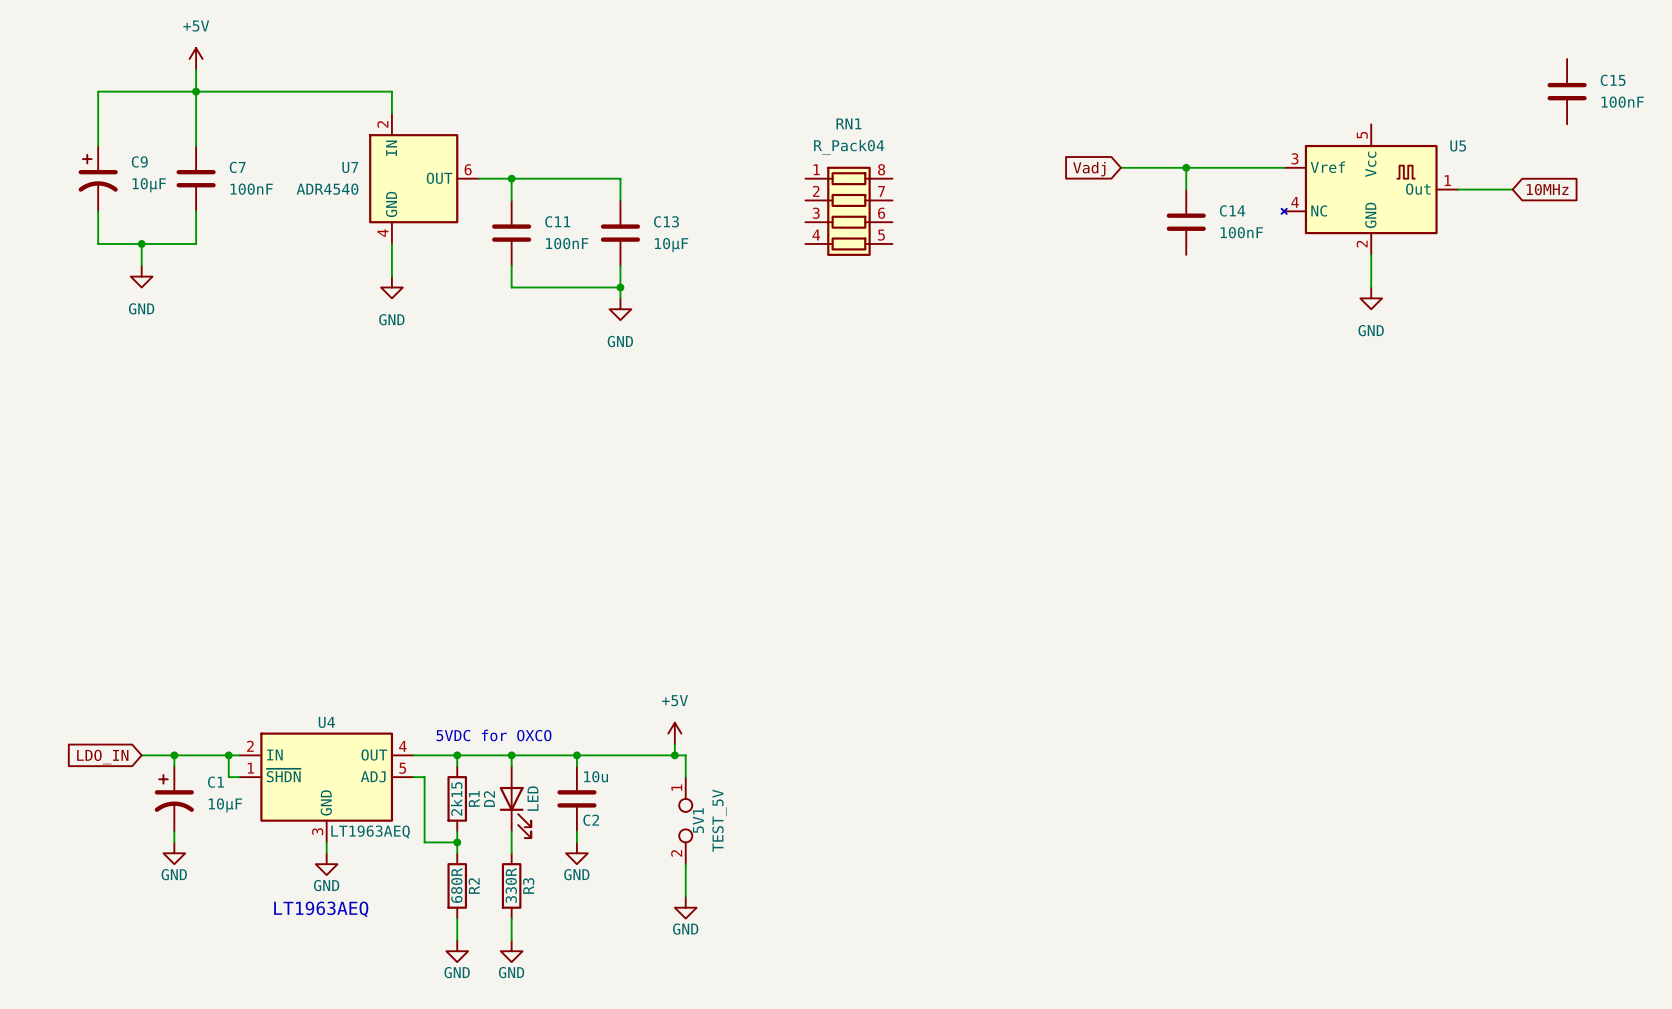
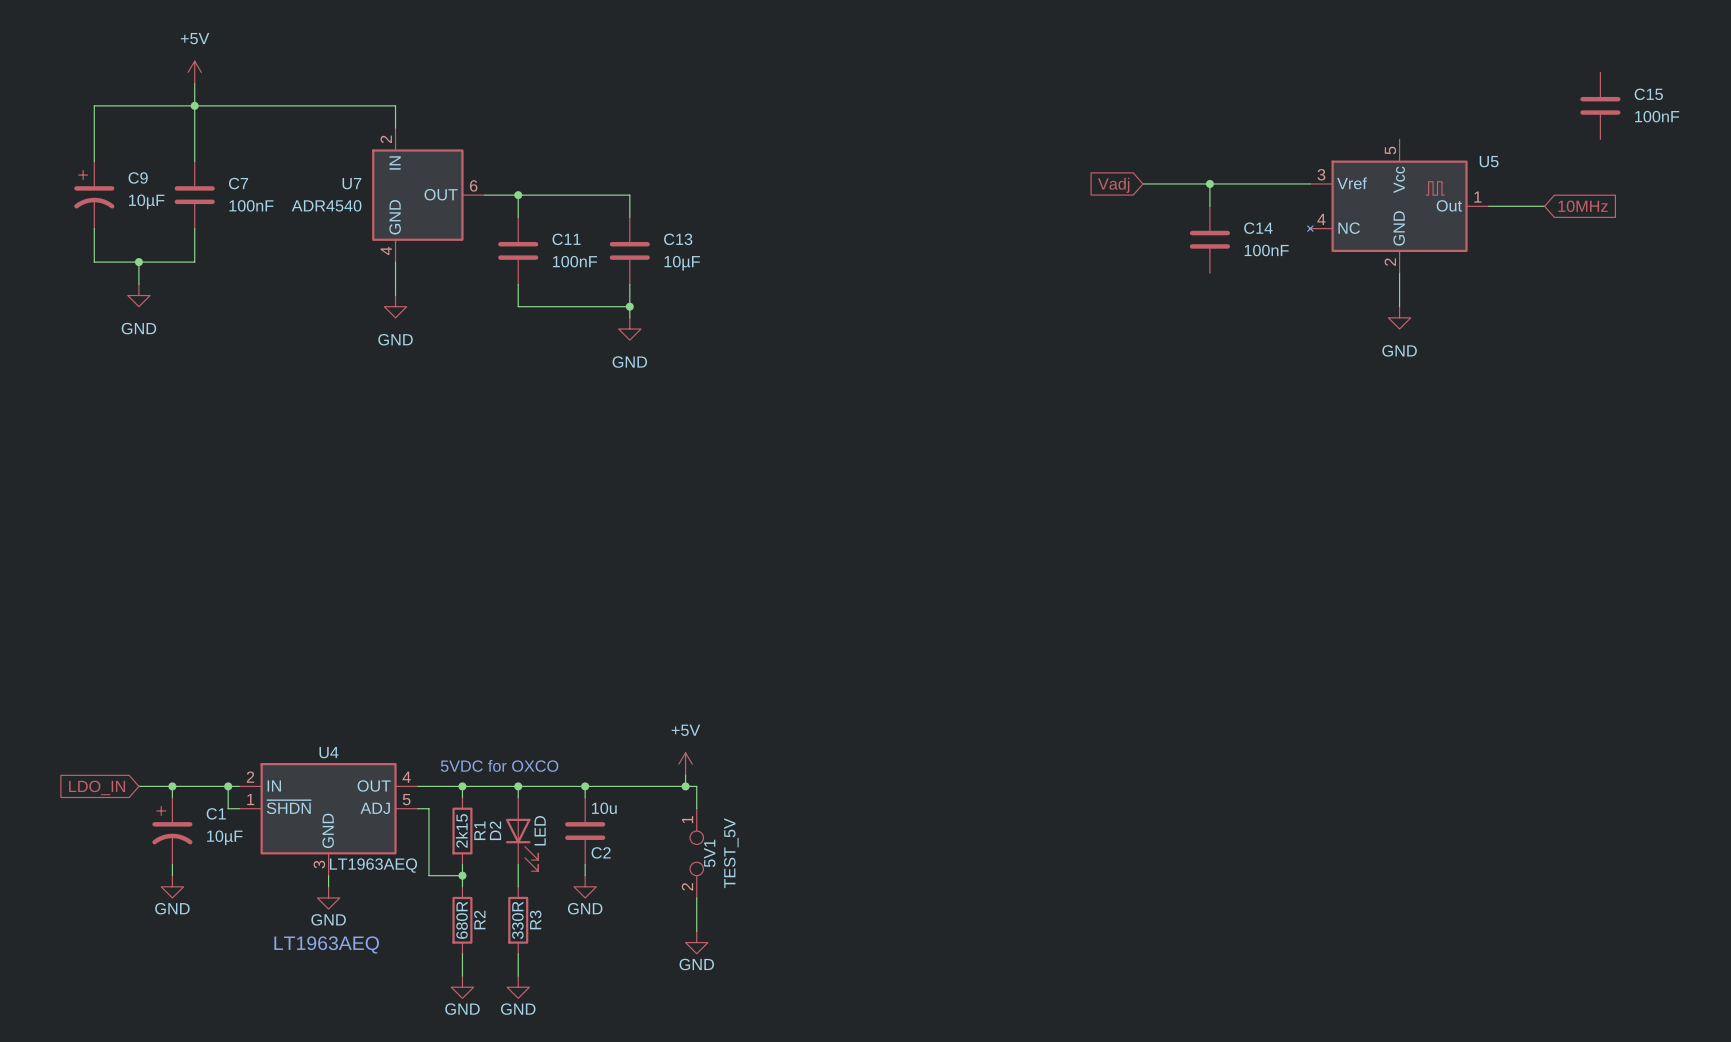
RN1: R_Pack04 (848, 211) -> none

